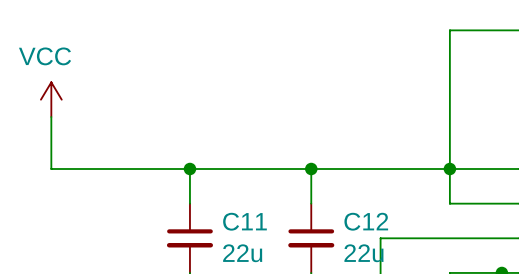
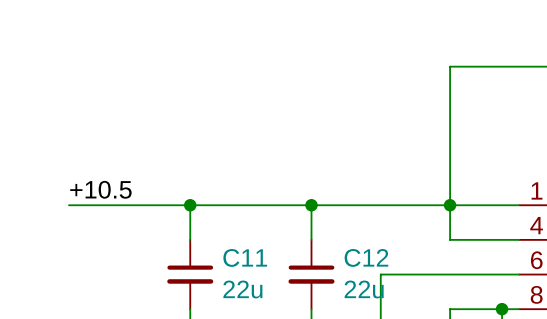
power symbol: VCC (51, 99) -> none
wire: (51, 117) (51, 169) (68, 169) -> none
label: none -> +10.5 (100, 189)

